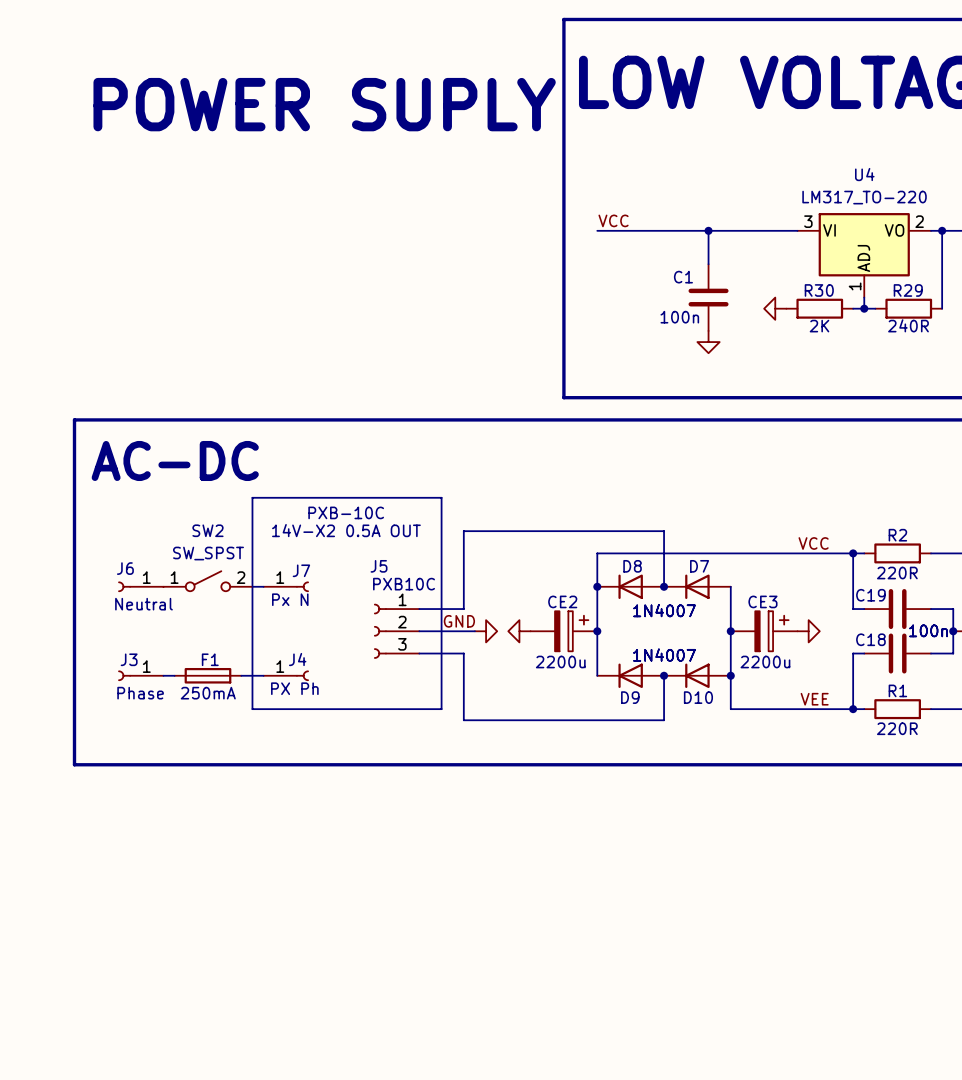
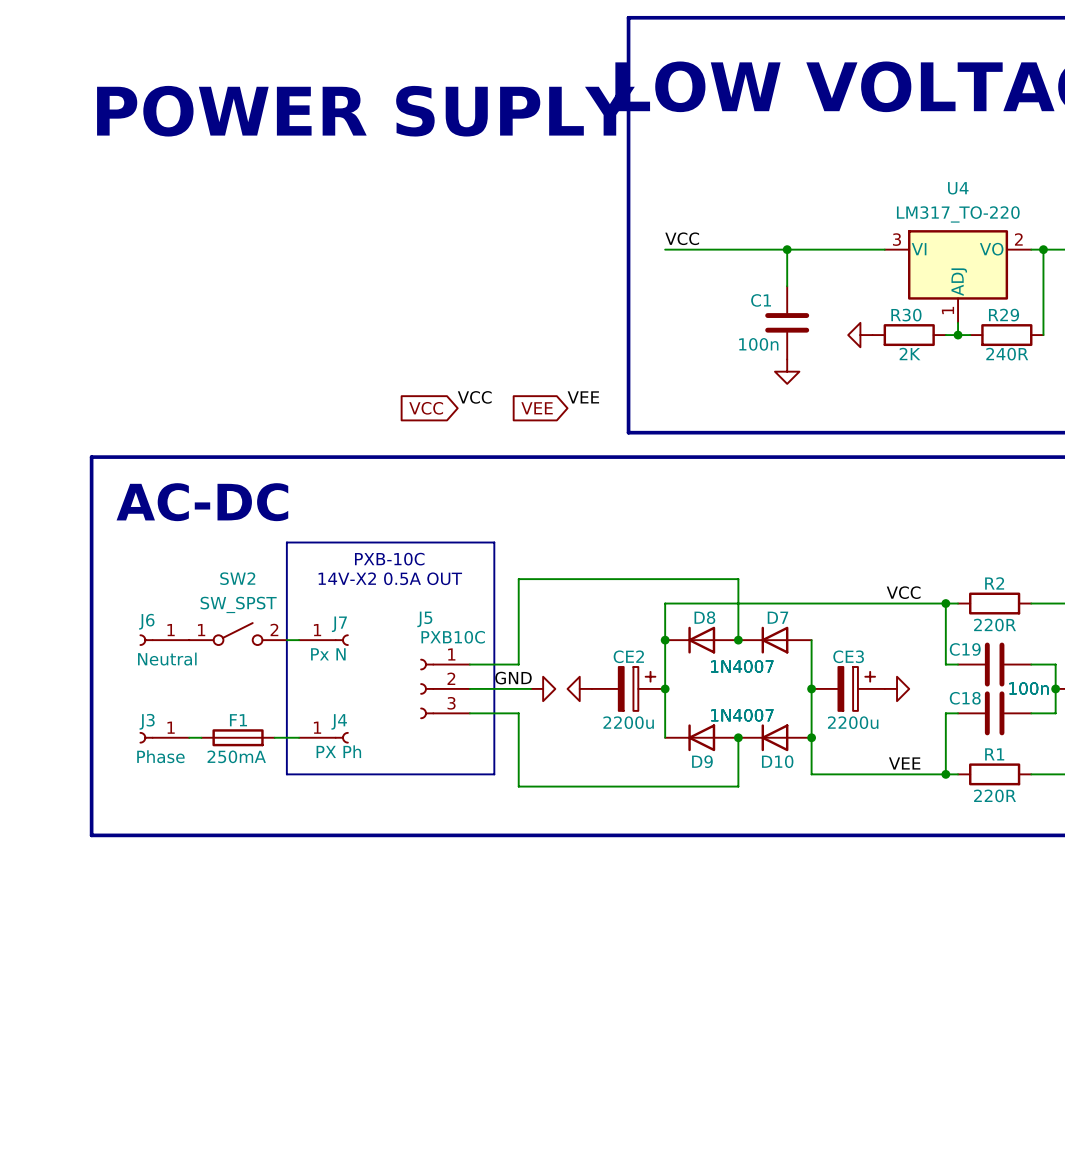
label: none -> VCC (474, 397)
label: none -> VEE (583, 397)
global label: none -> VCC (426, 408)
global label: none -> VEE (537, 408)

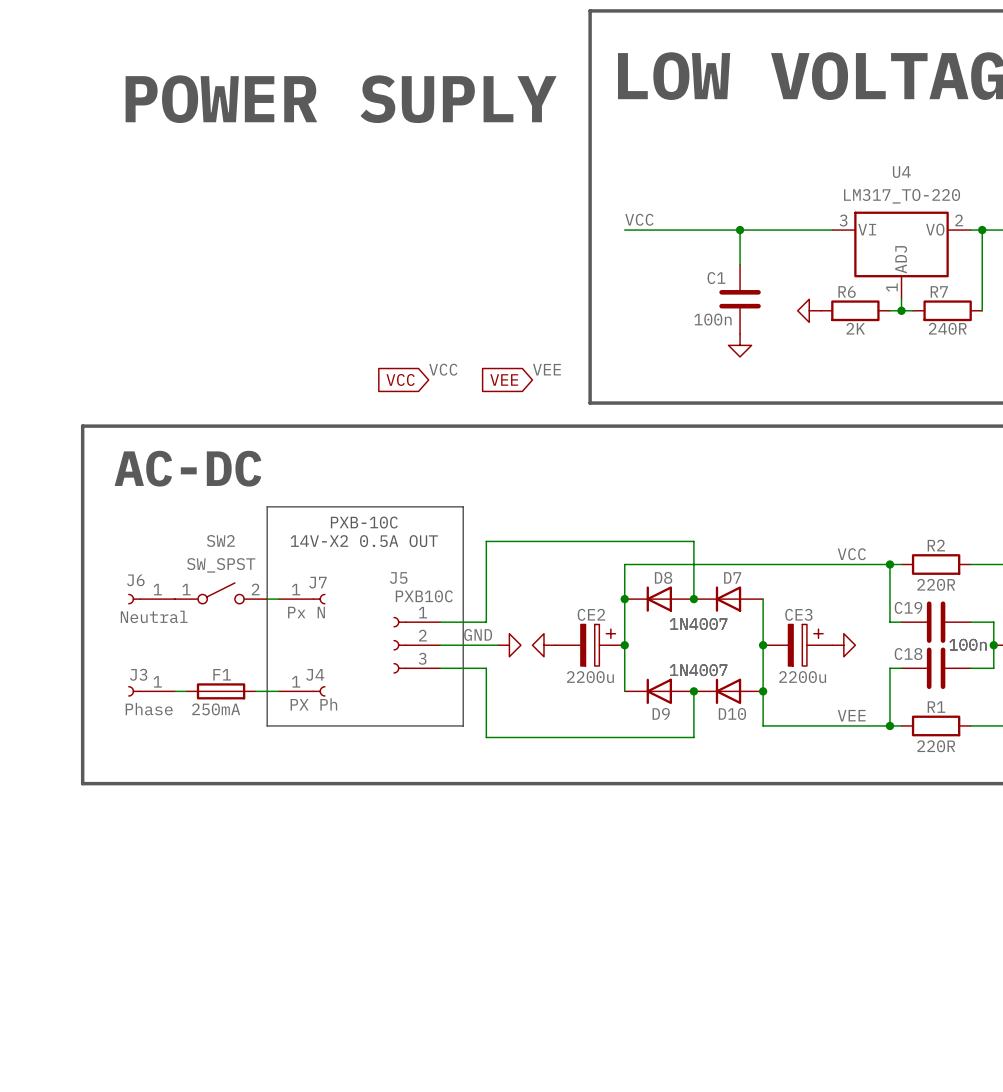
R30 name: R30 (906, 315) -> R6 (847, 291)
R29 name: R29 (1004, 315) -> R7 (939, 291)

